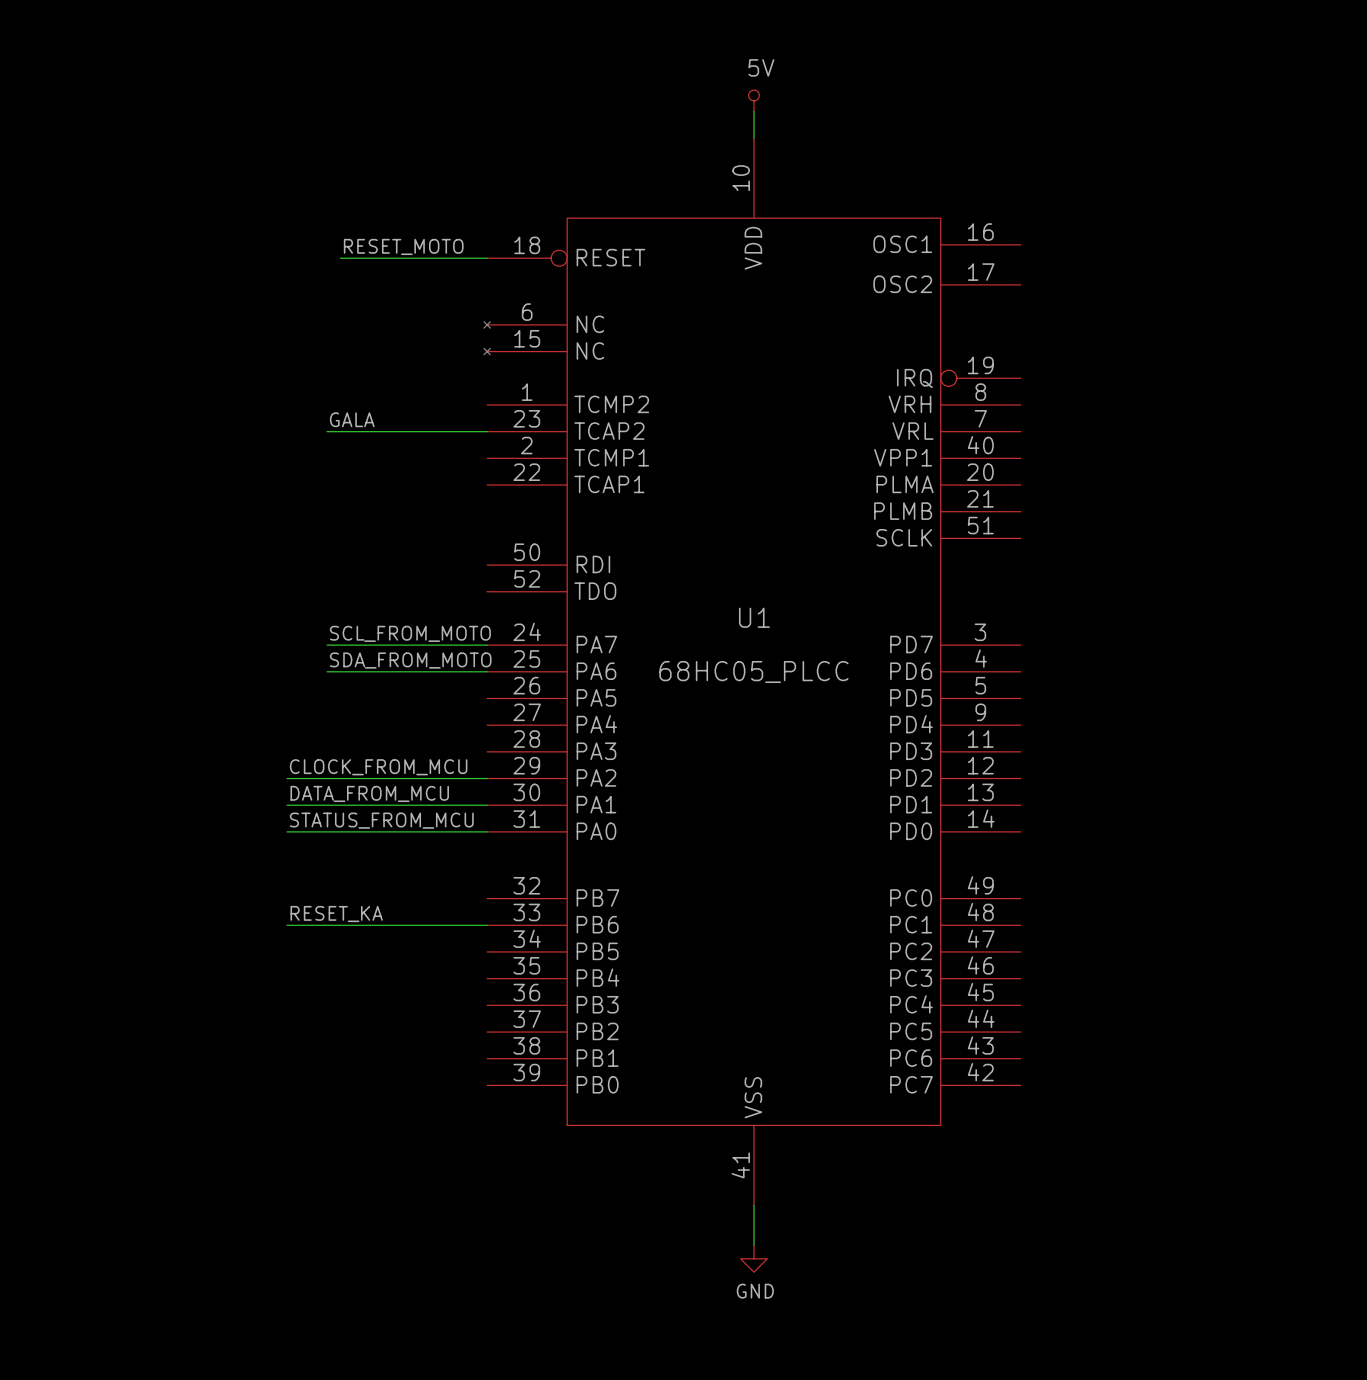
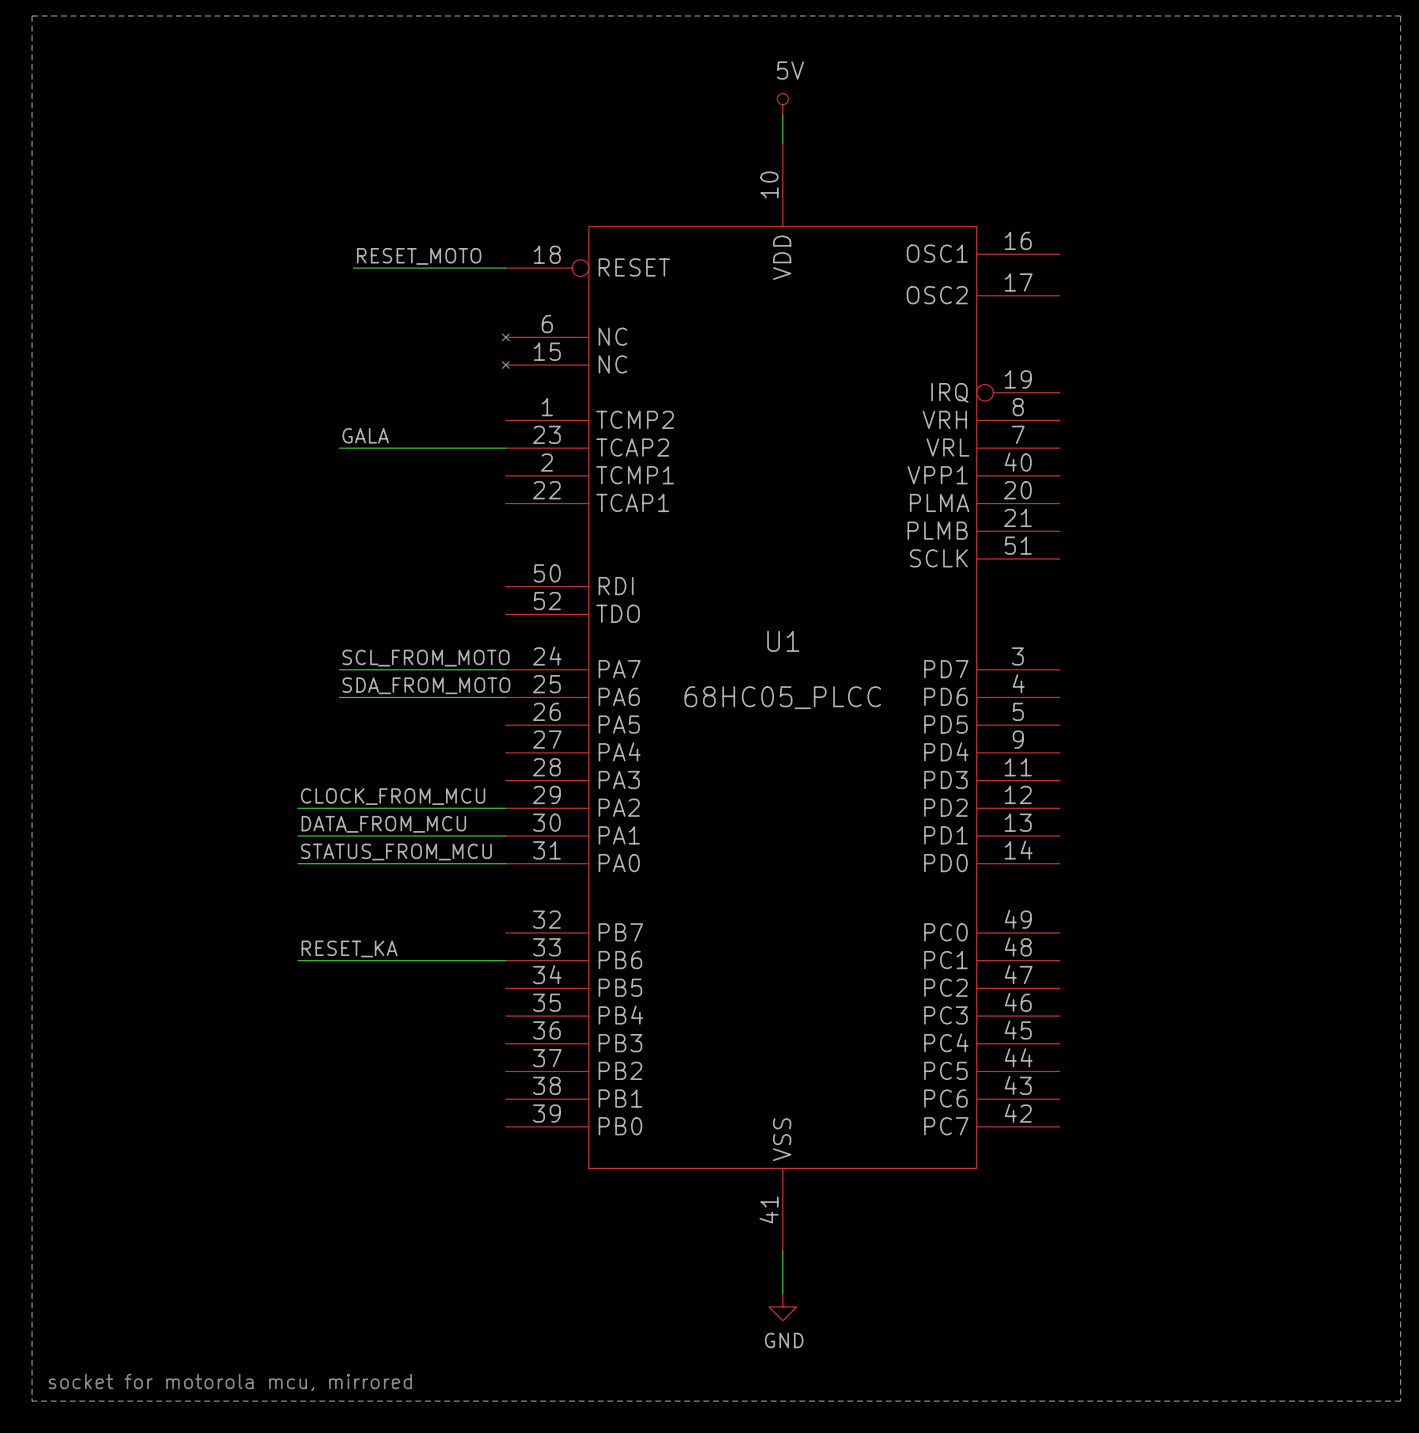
line: none -> (32, 15) (1400, 15) (1400, 1401) (32, 1401) (32, 15)
text: none -> socket for motorola mcu, mirrored (230, 1382)

